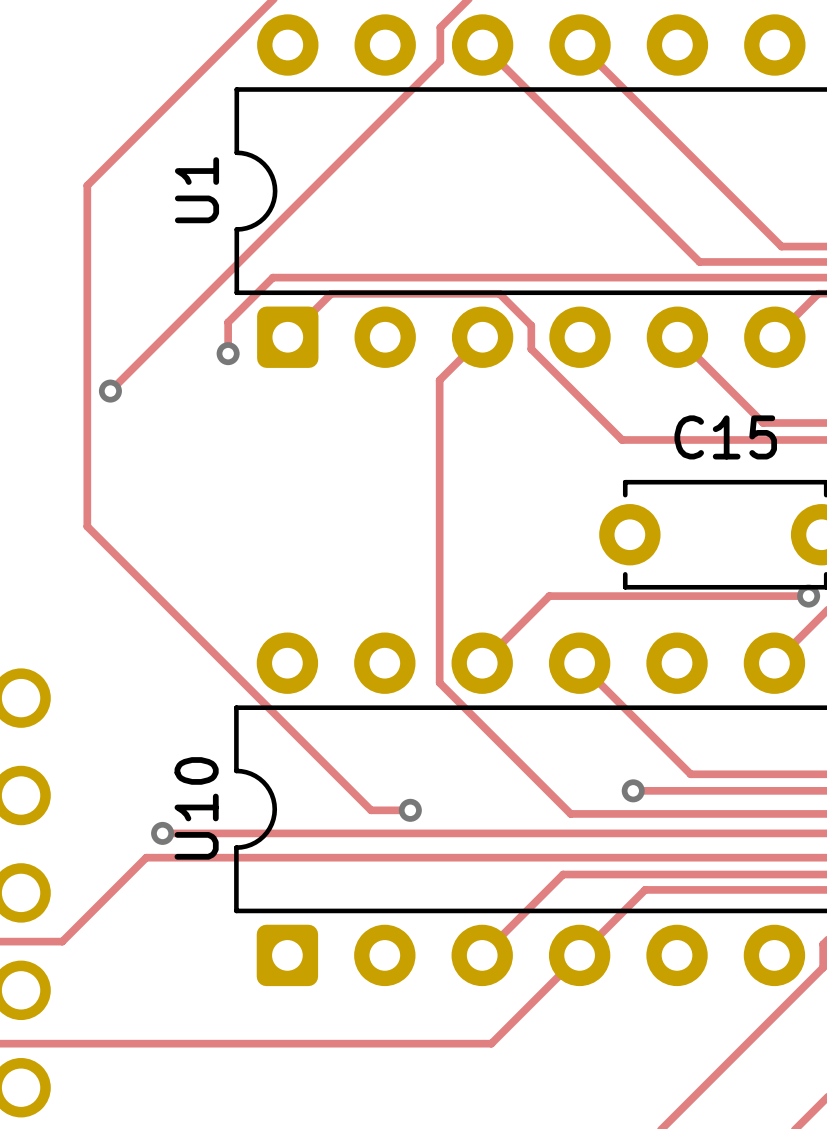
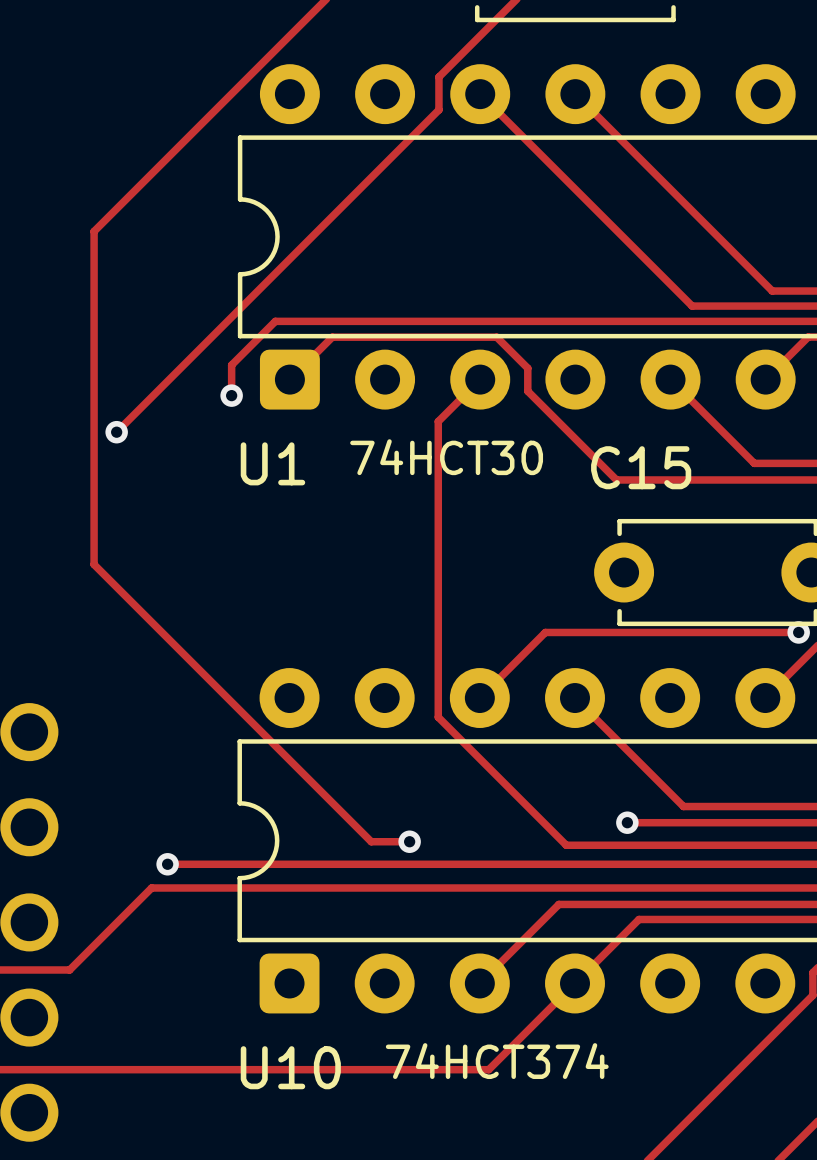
U1 name rotation: 0° (197, 190) -> 90° clockwise (272, 463)
U1 name position: U1 (197, 190) -> U1 (272, 463)
text: none -> 74HCT30 (446, 457)
C15 name position: C15 (725, 437) -> C15 (641, 467)
U10 name rotation: 0° (196, 808) -> 90° clockwise (290, 1067)
U10 name position: U10 (196, 808) -> U10 (290, 1067)
text: none -> 74HCT374 (497, 1061)

